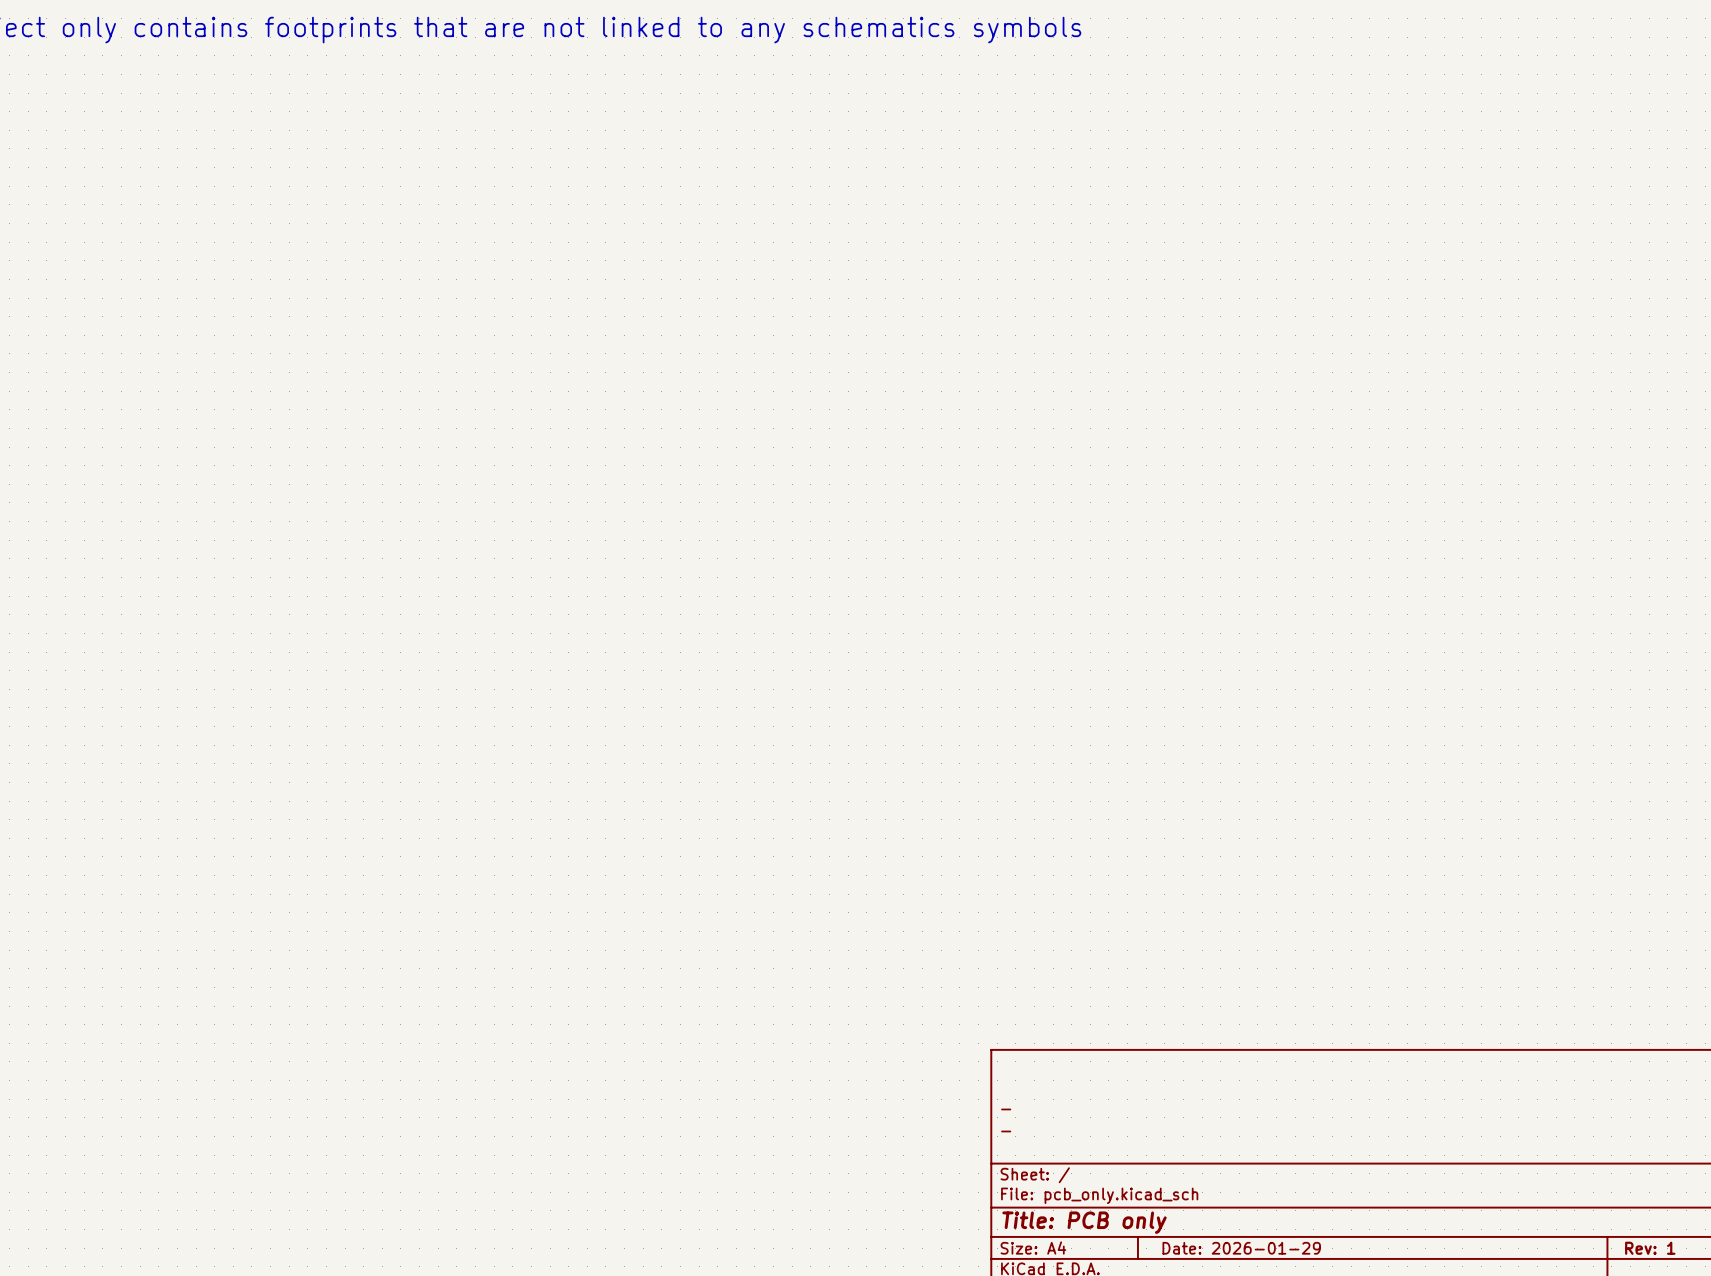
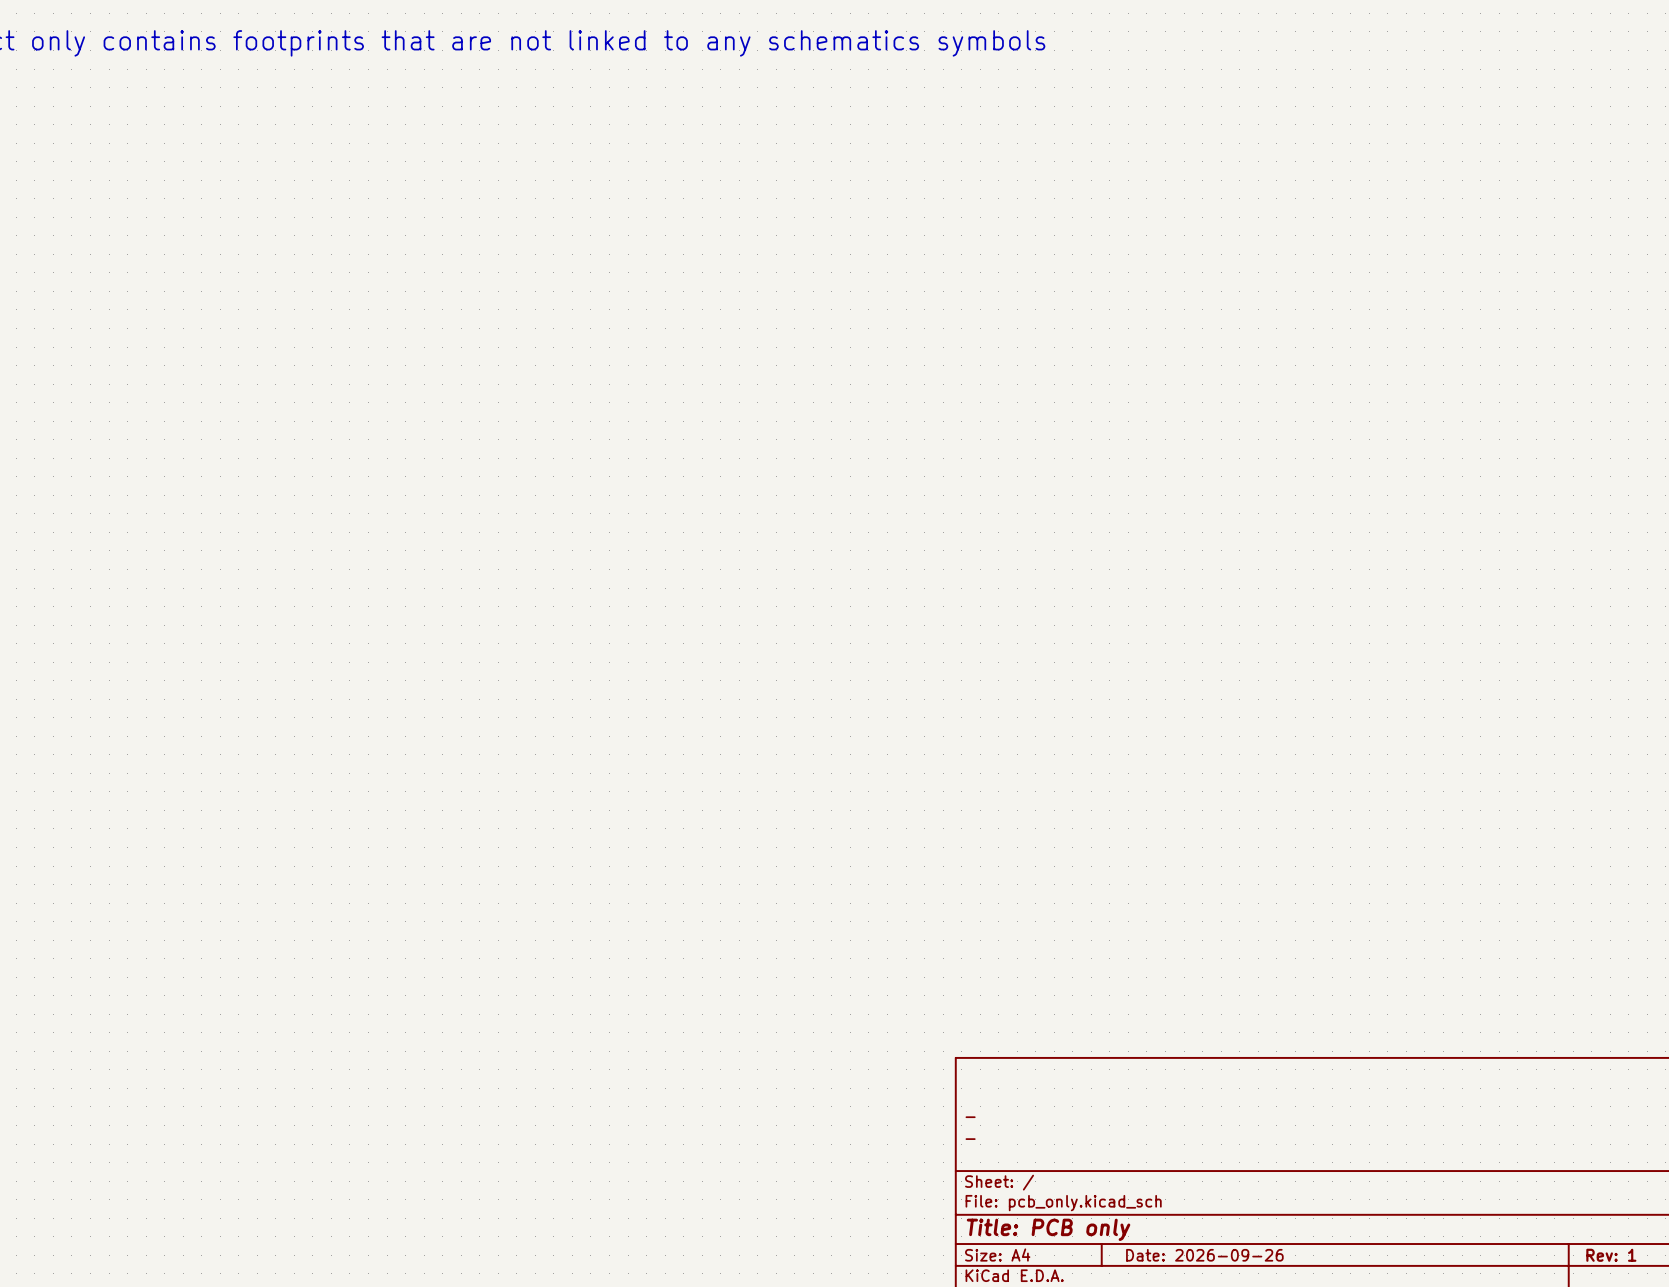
title block: Date: 2026-01-29 (1241, 1248) -> Date: 2026-09-26 (1204, 1255)

